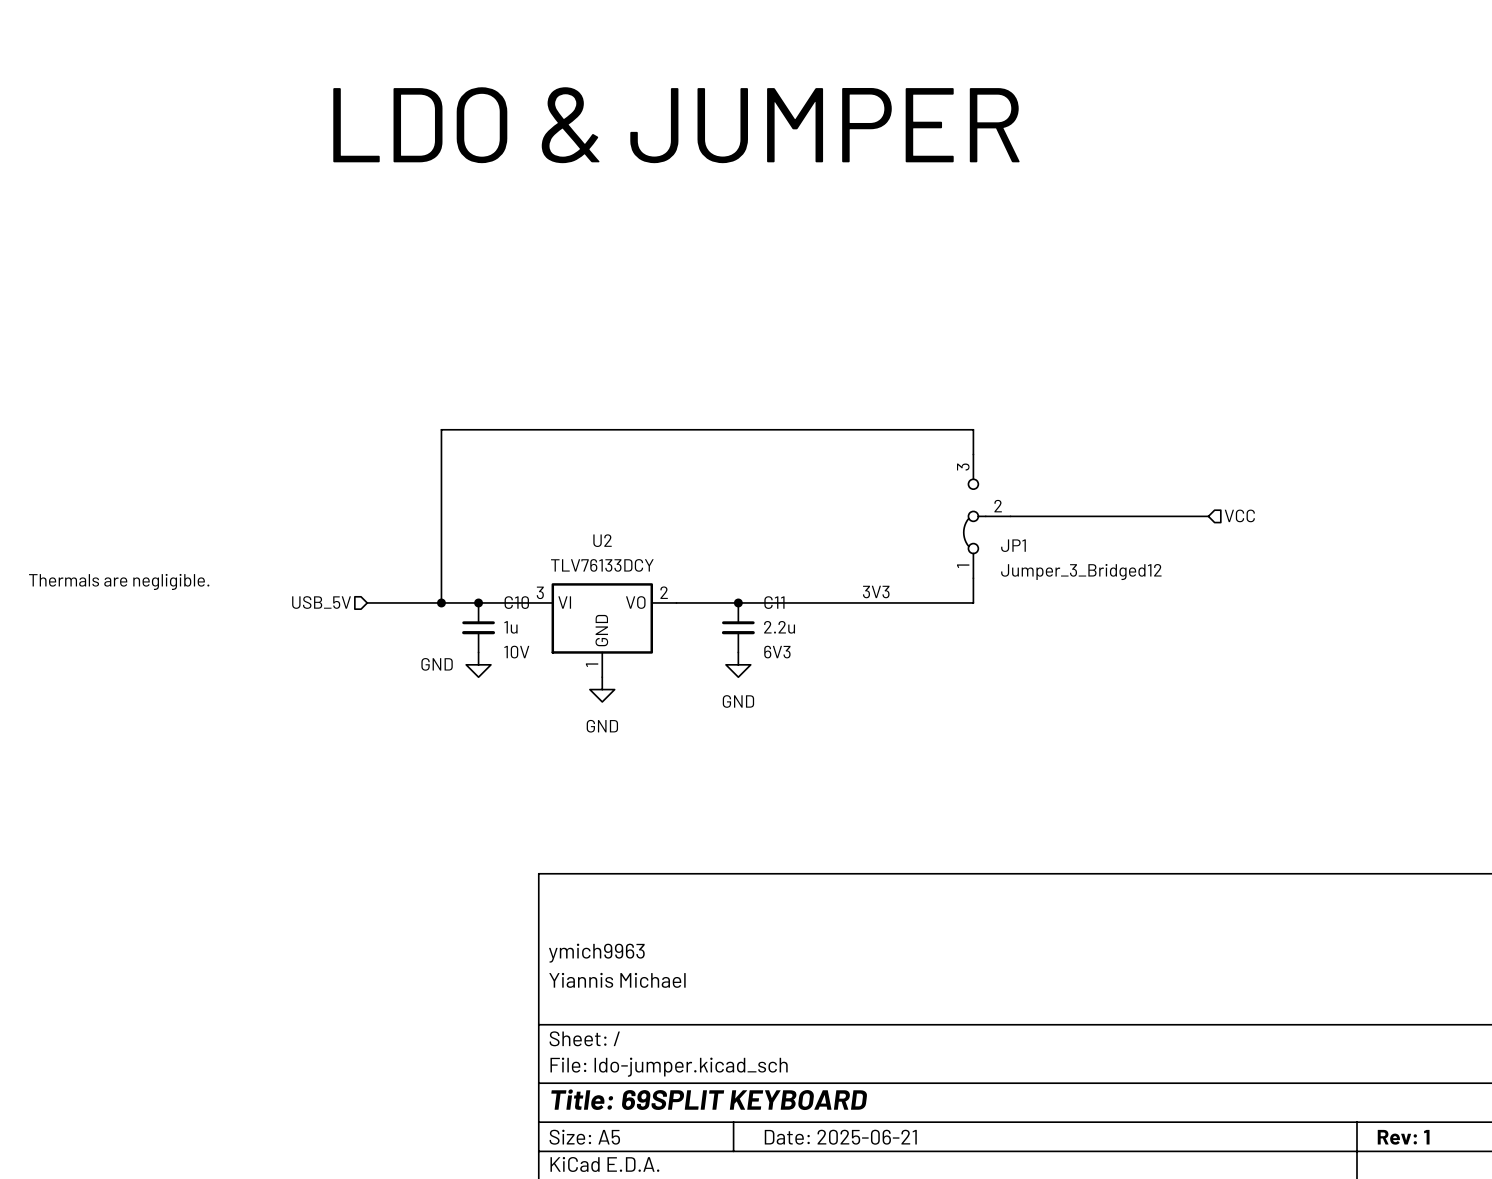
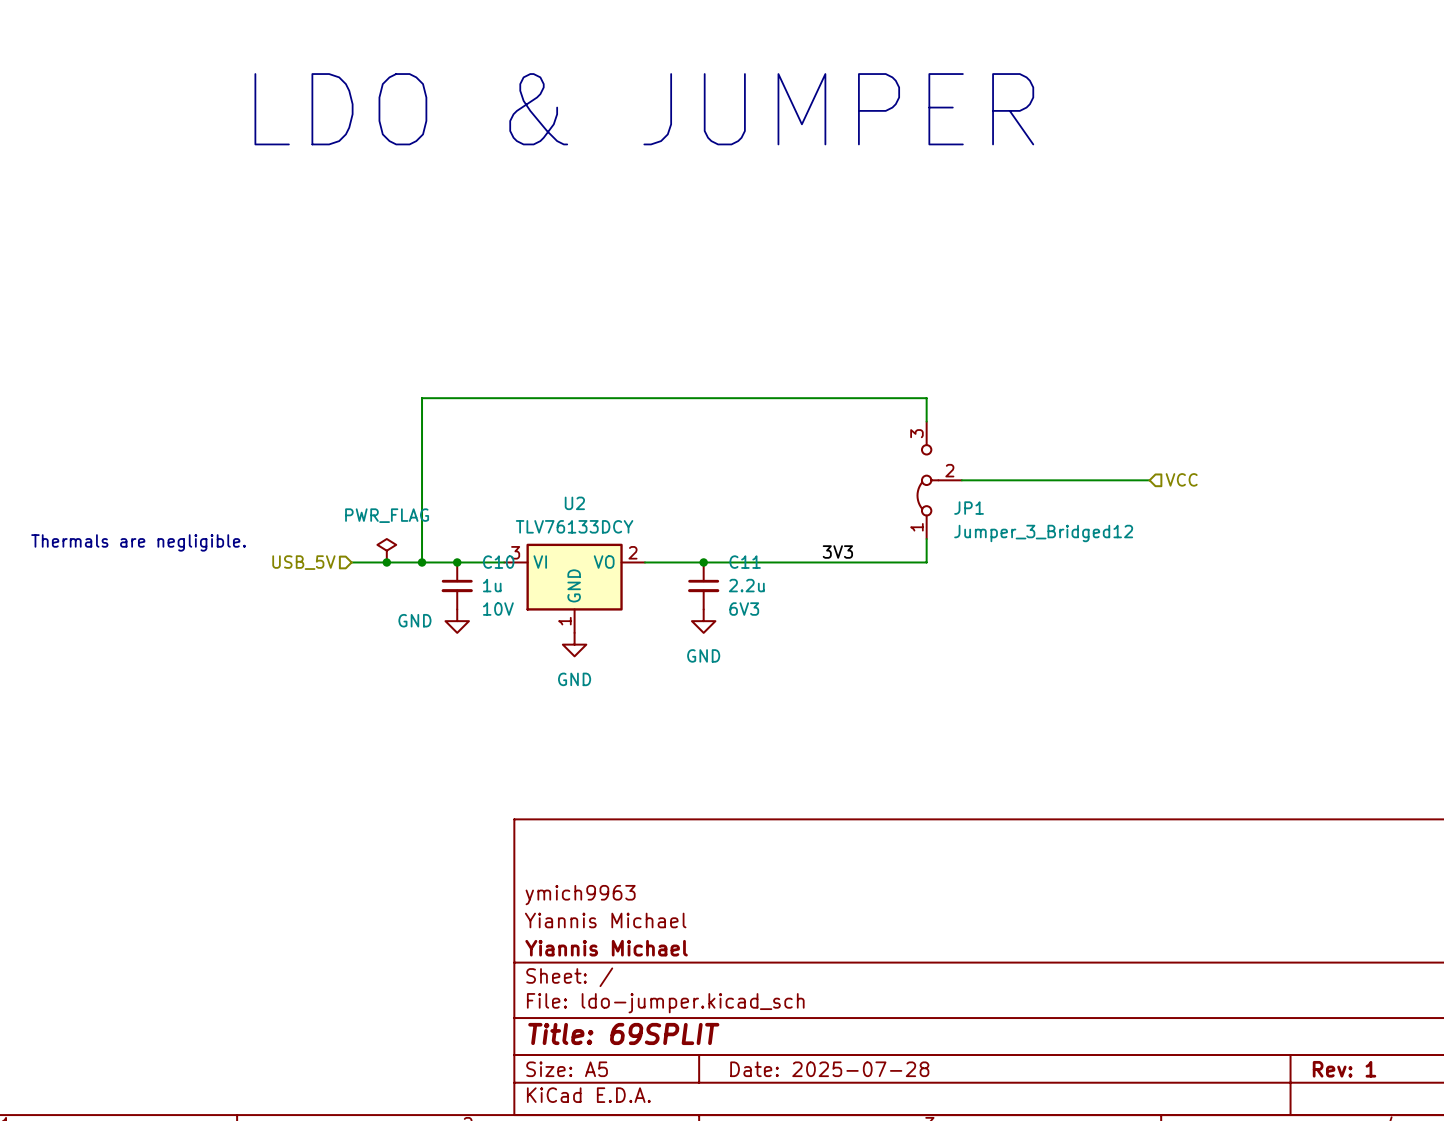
power symbol: none -> PWR_FLAG (386, 550)
junction: none -> (386, 562)
title block: none -> Yiannis Michael (606, 948)
title block: Title: 69SPLIT KEYBOARD (709, 1099) -> Title: 69SPLIT (623, 1033)
title block: Date: 2025-06-21 (840, 1137) -> Date: 2025-07-28 (829, 1069)

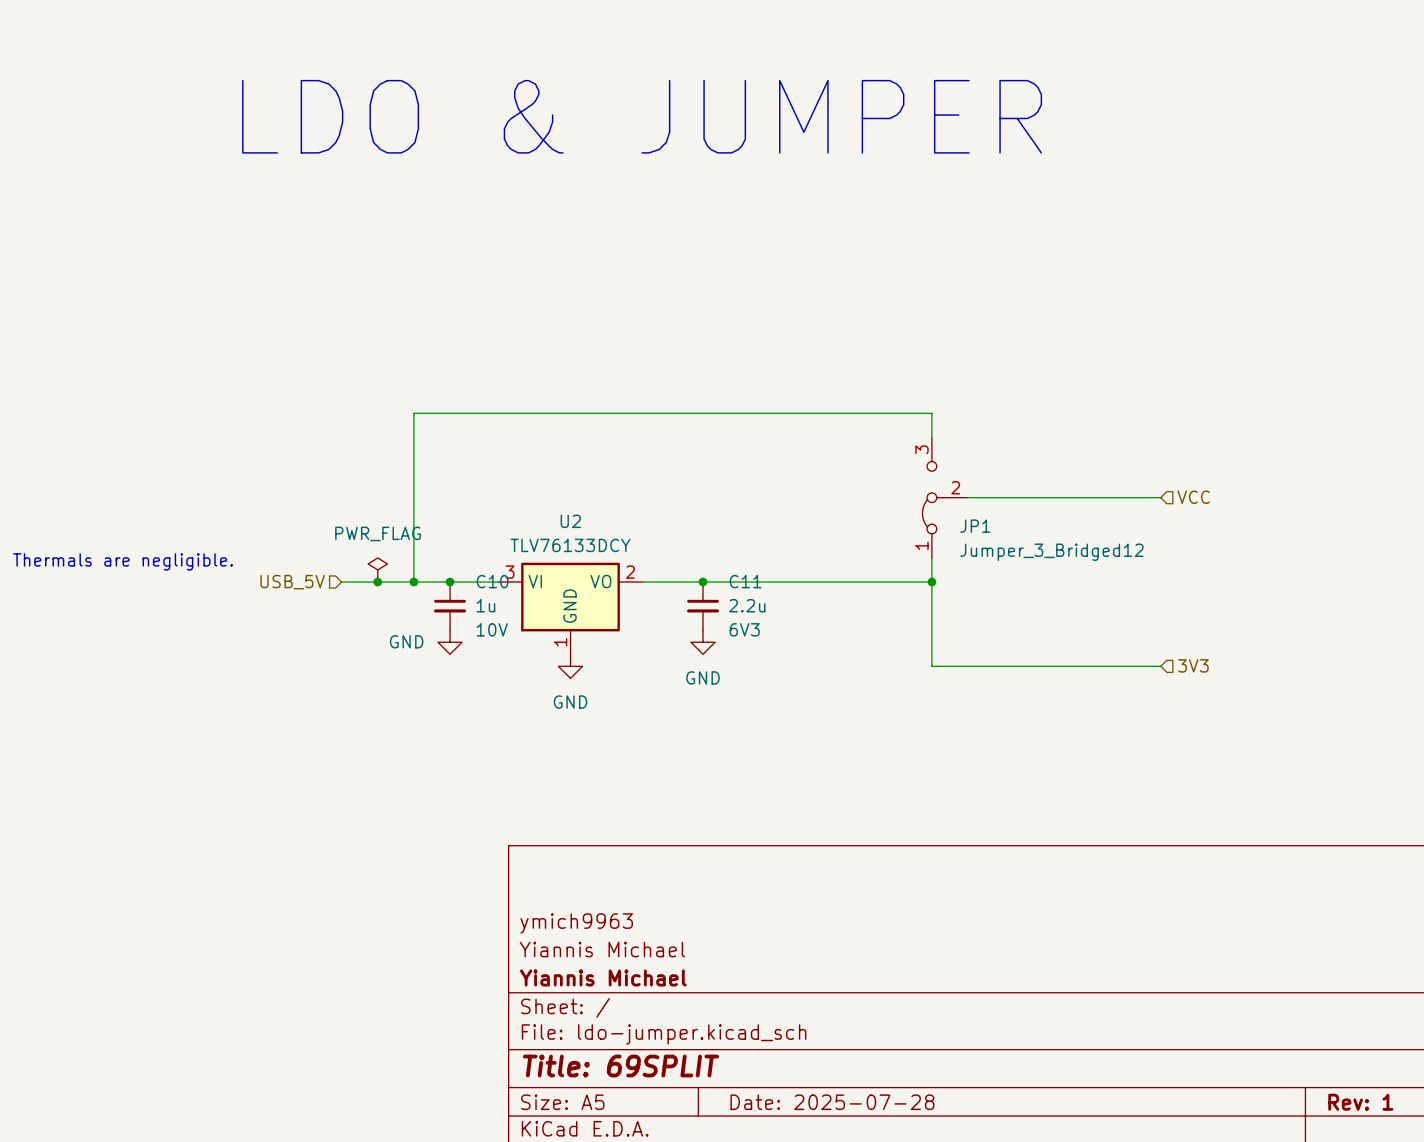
label: 3V3 (837, 552) -> none
wire: none -> (931, 582) (931, 666) (1160, 666)
junction: none -> (931, 582)
hierarchical label: none -> 3V3 (1193, 665)

